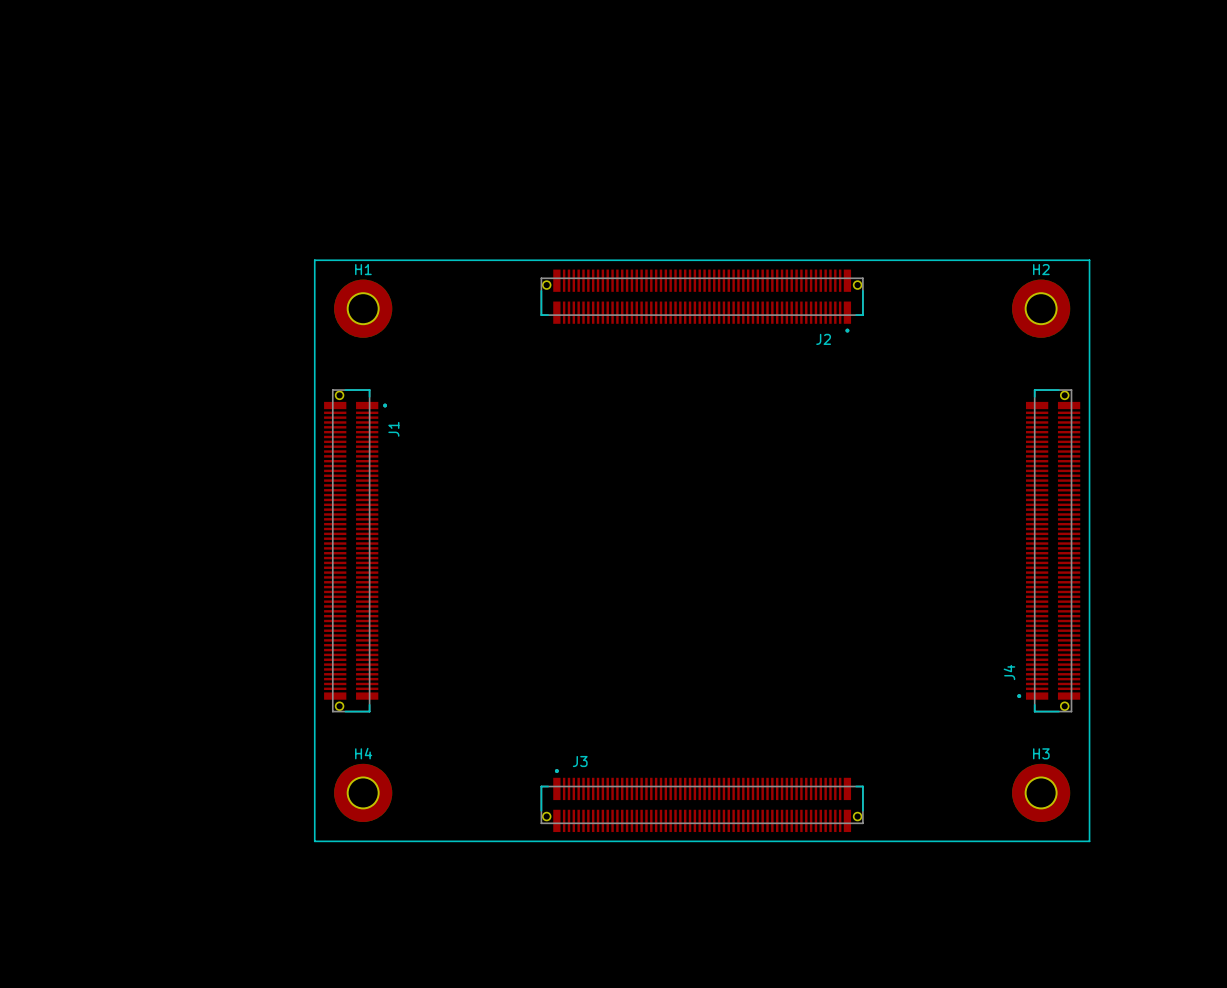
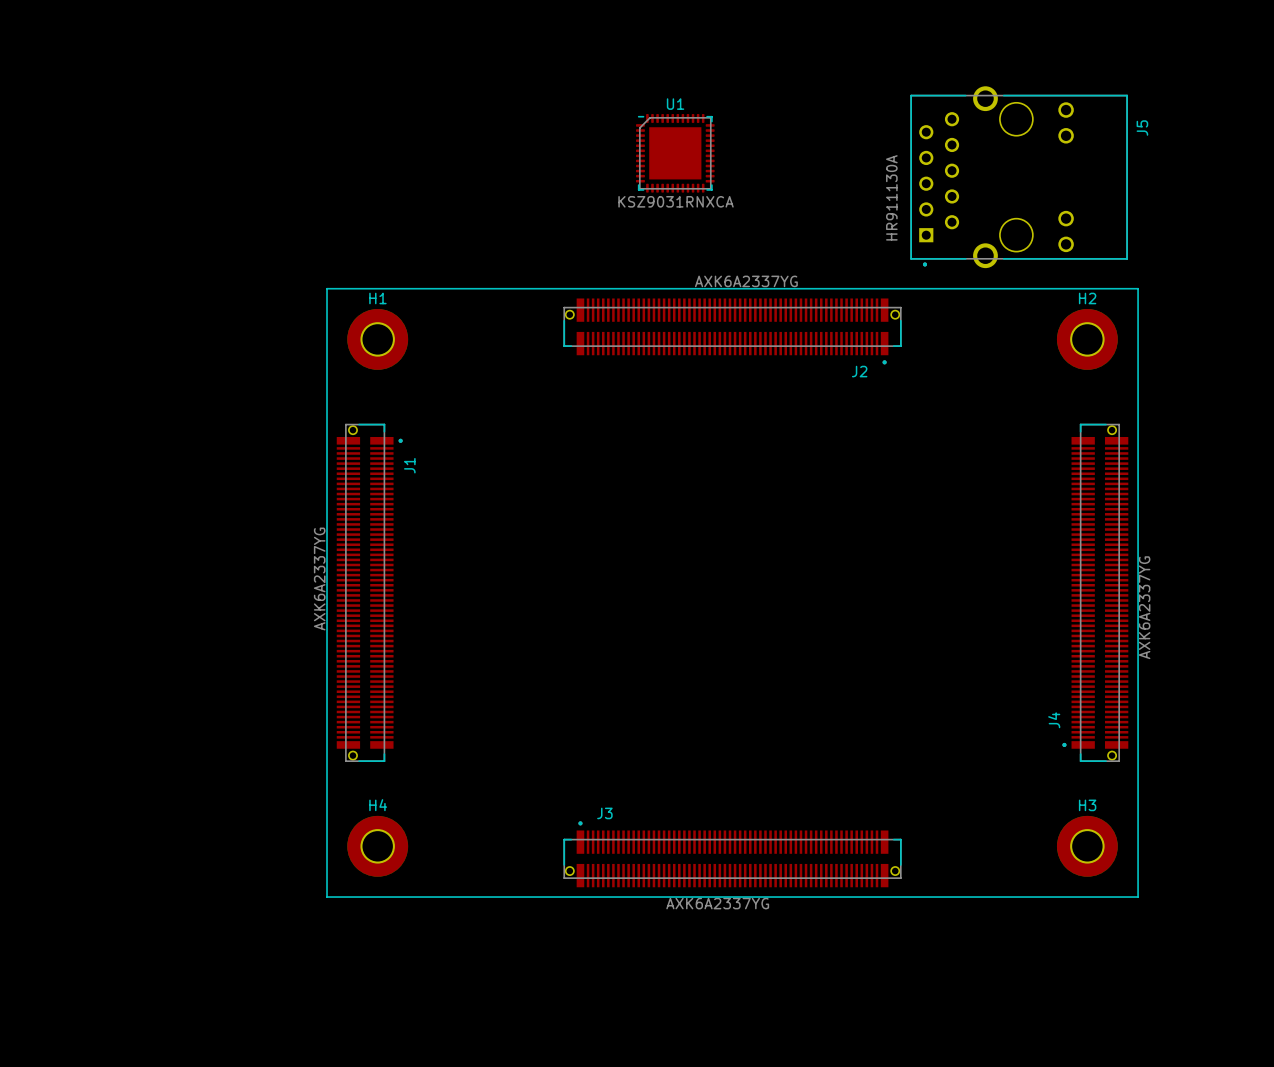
U1: none -> KSZ9031RNXCA (675, 153)
J5: none -> HR911130A (1019, 177)
J2 value: none -> AXK6A2337YG (746, 281)
J1 value: none -> AXK6A2337YG (319, 579)
J4 value: none -> AXK6A2337YG (1144, 607)
J3 value: none -> AXK6A2337YG (717, 903)

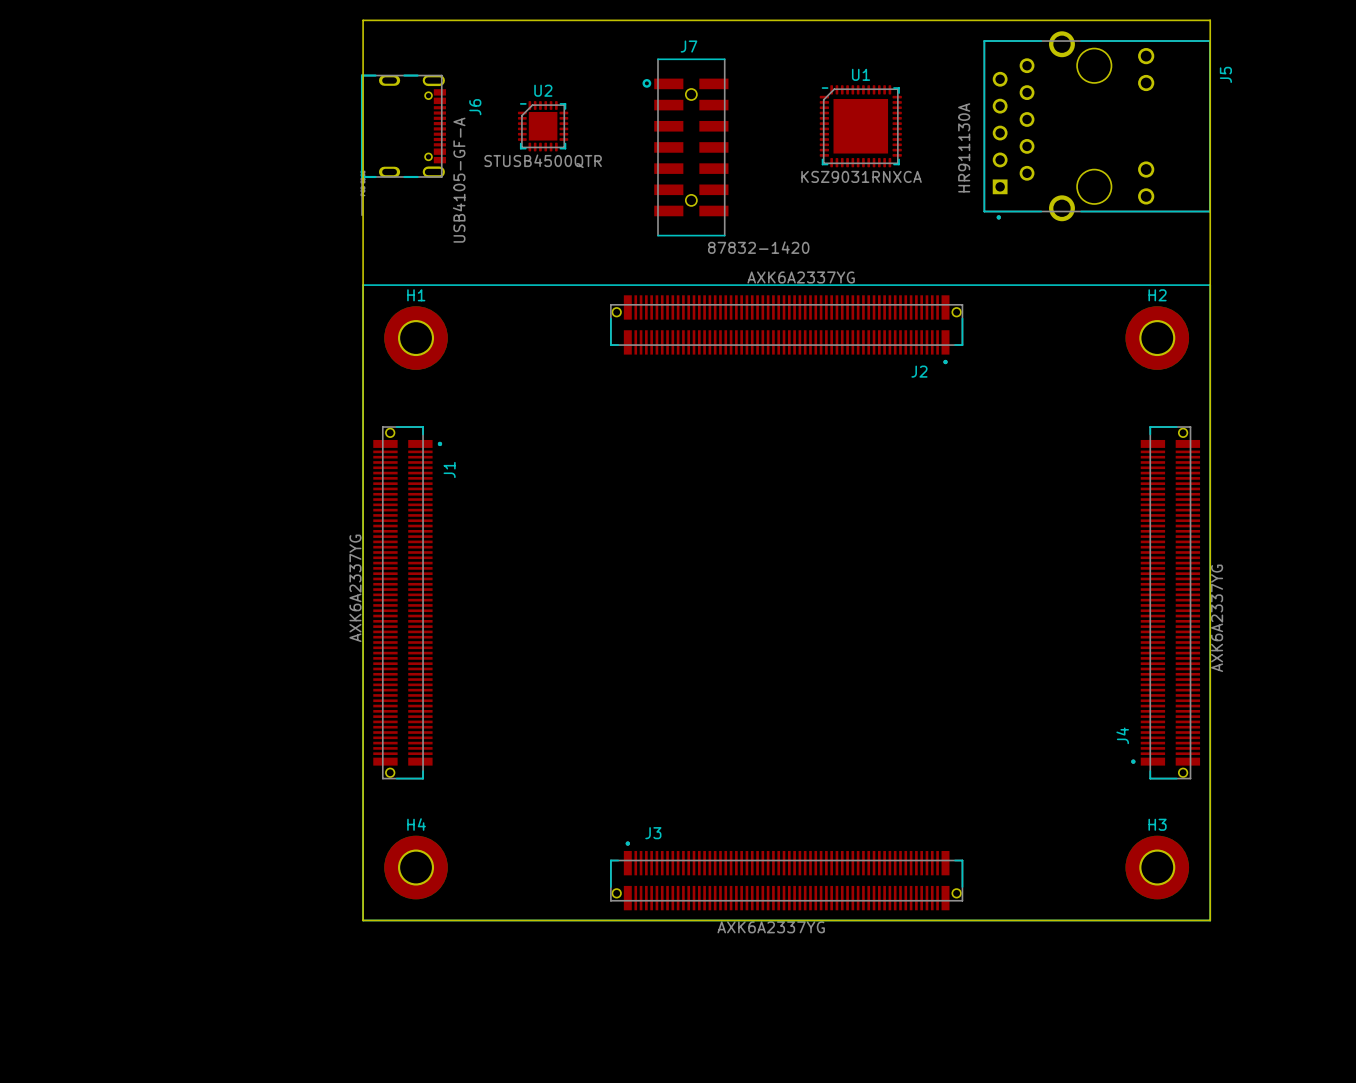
board edge: none -> (363, 20) (363, 920) (1210, 920) (1210, 20) (363, 20)
U2: none -> STUSB4500QTR (543, 126)
U1 position: (675, 153) -> (860, 126)
J6: none -> USB4105-GF-A (403, 145)
J7: none -> 87832-1420 (685, 147)
J5 position: (1019, 177) -> (1097, 126)

